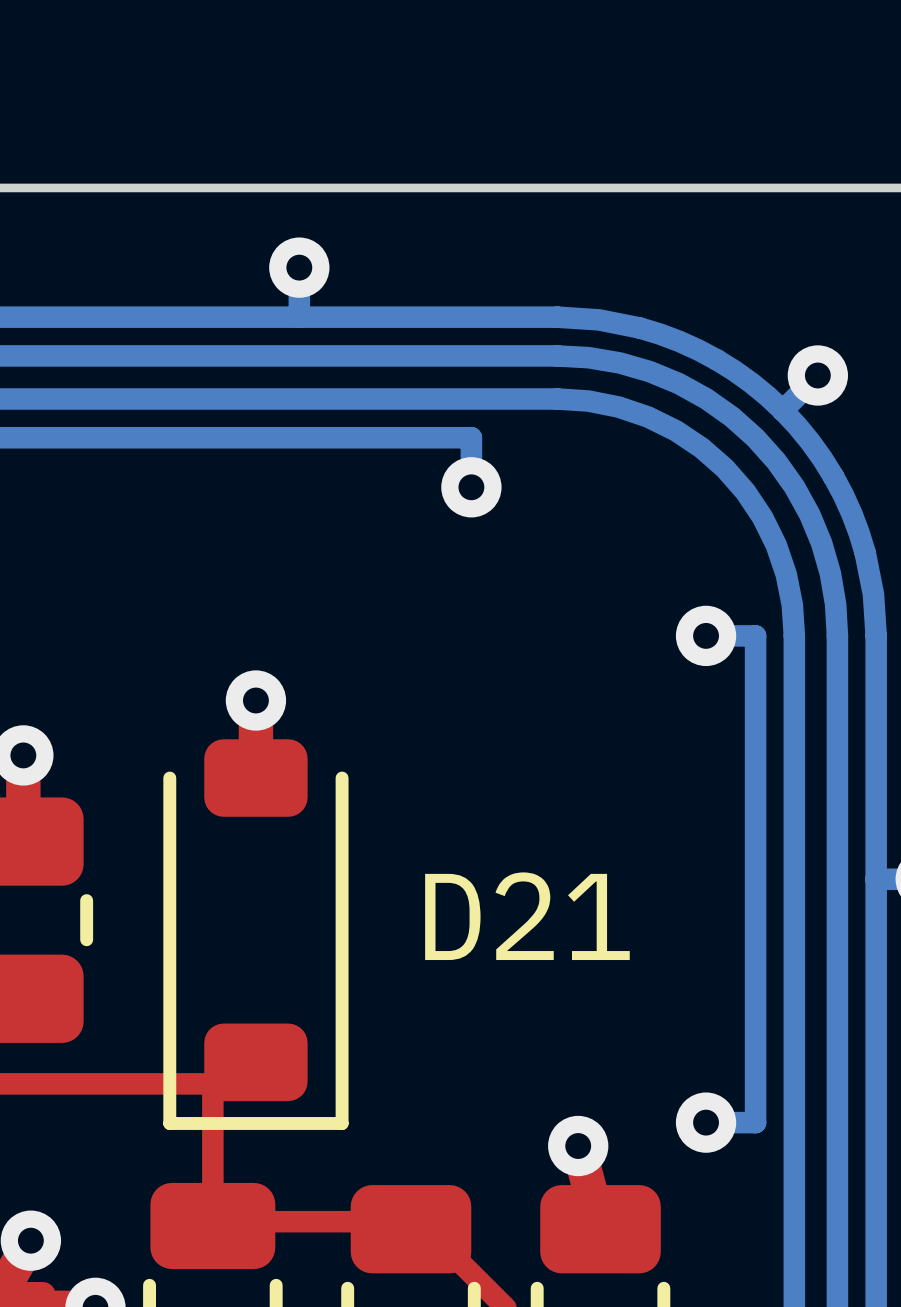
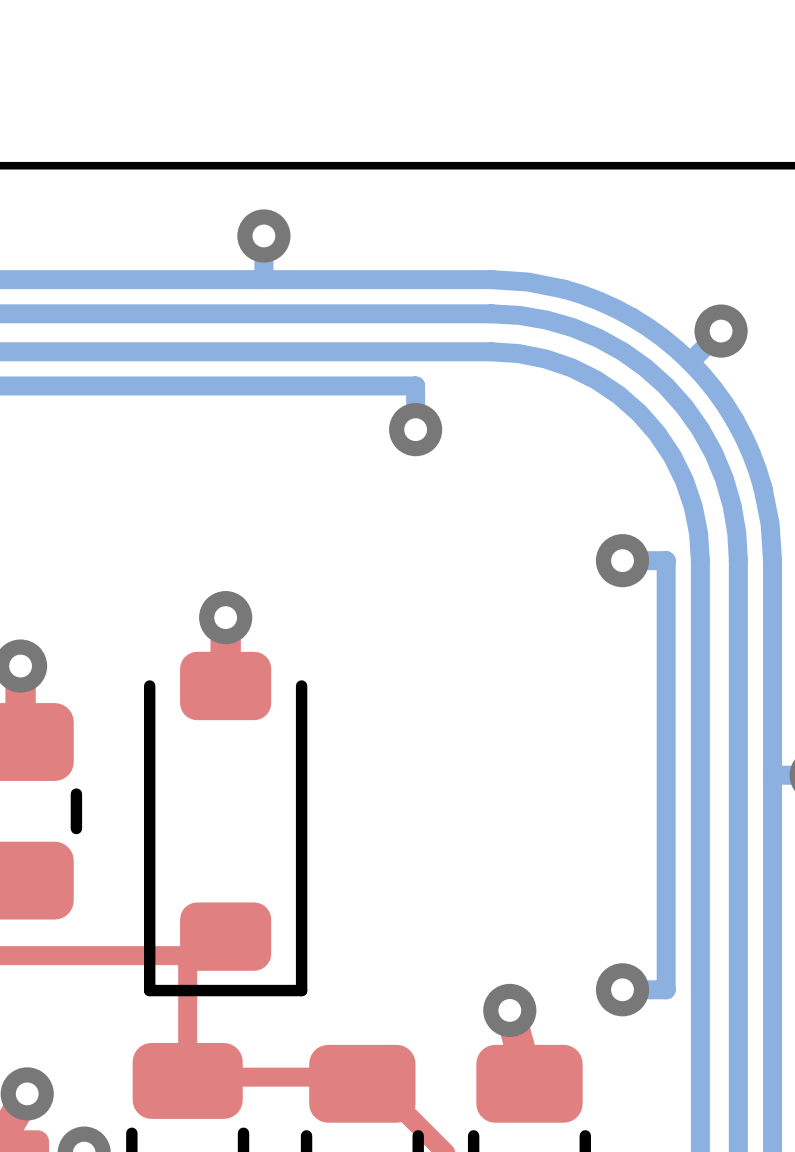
text: D21 (527, 916) -> none

